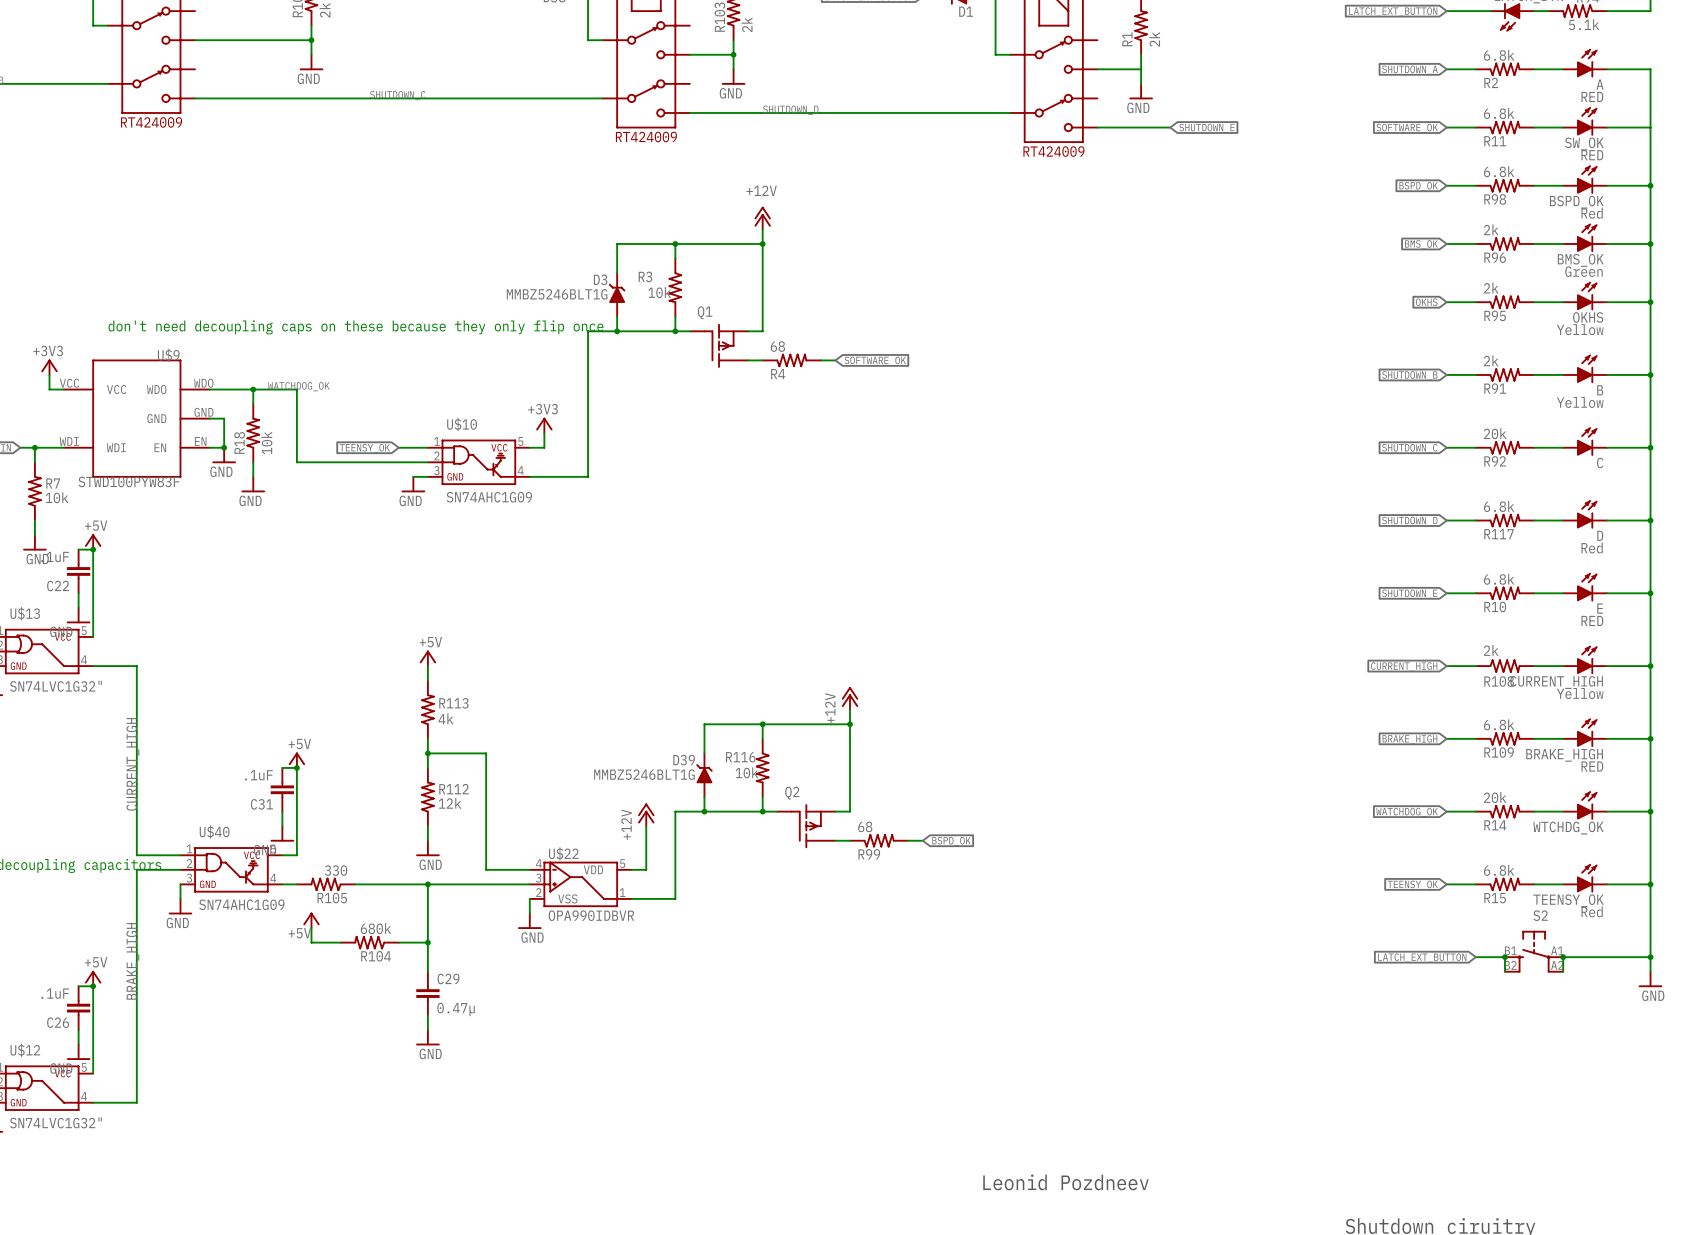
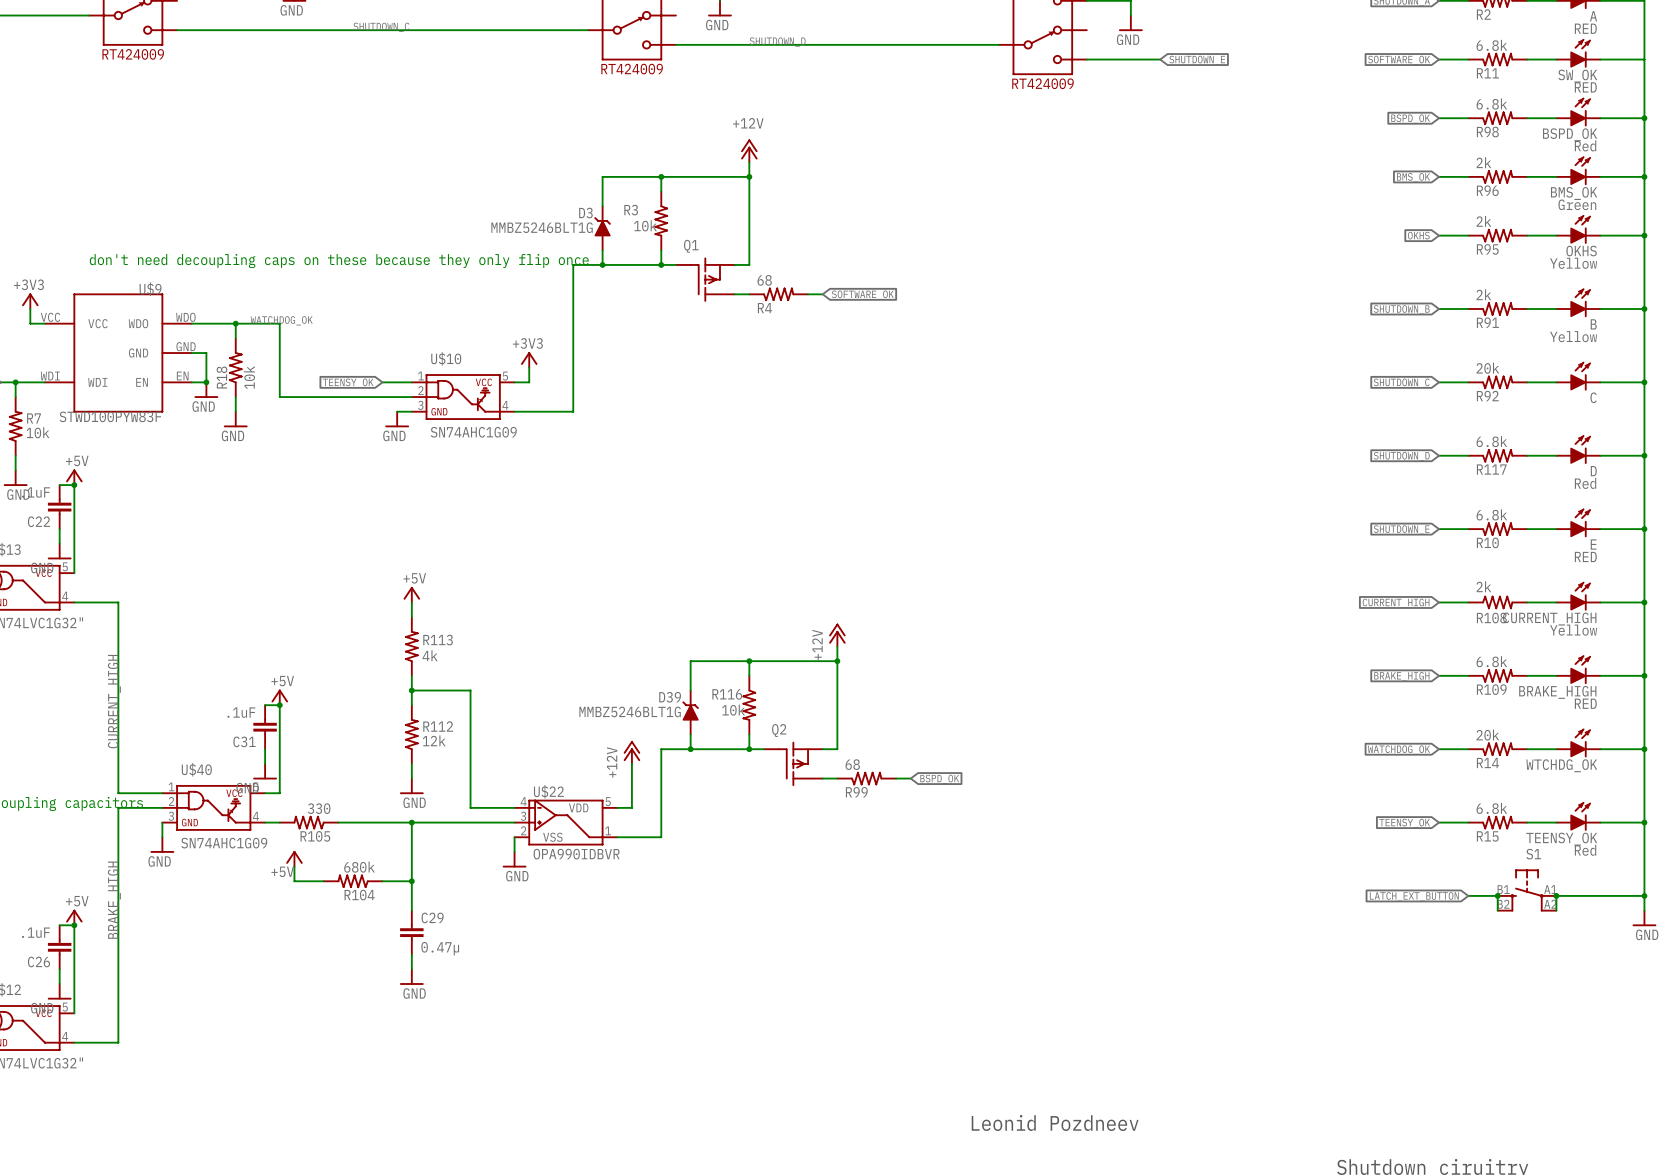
S2 name: S2 (1540, 915) -> S1 (1533, 854)

